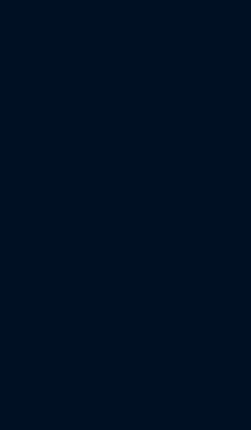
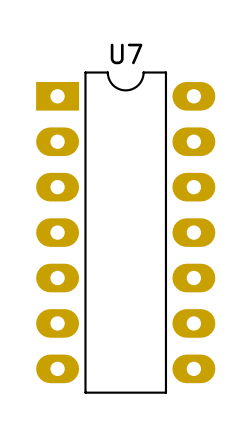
U7: none -> (125, 232)

